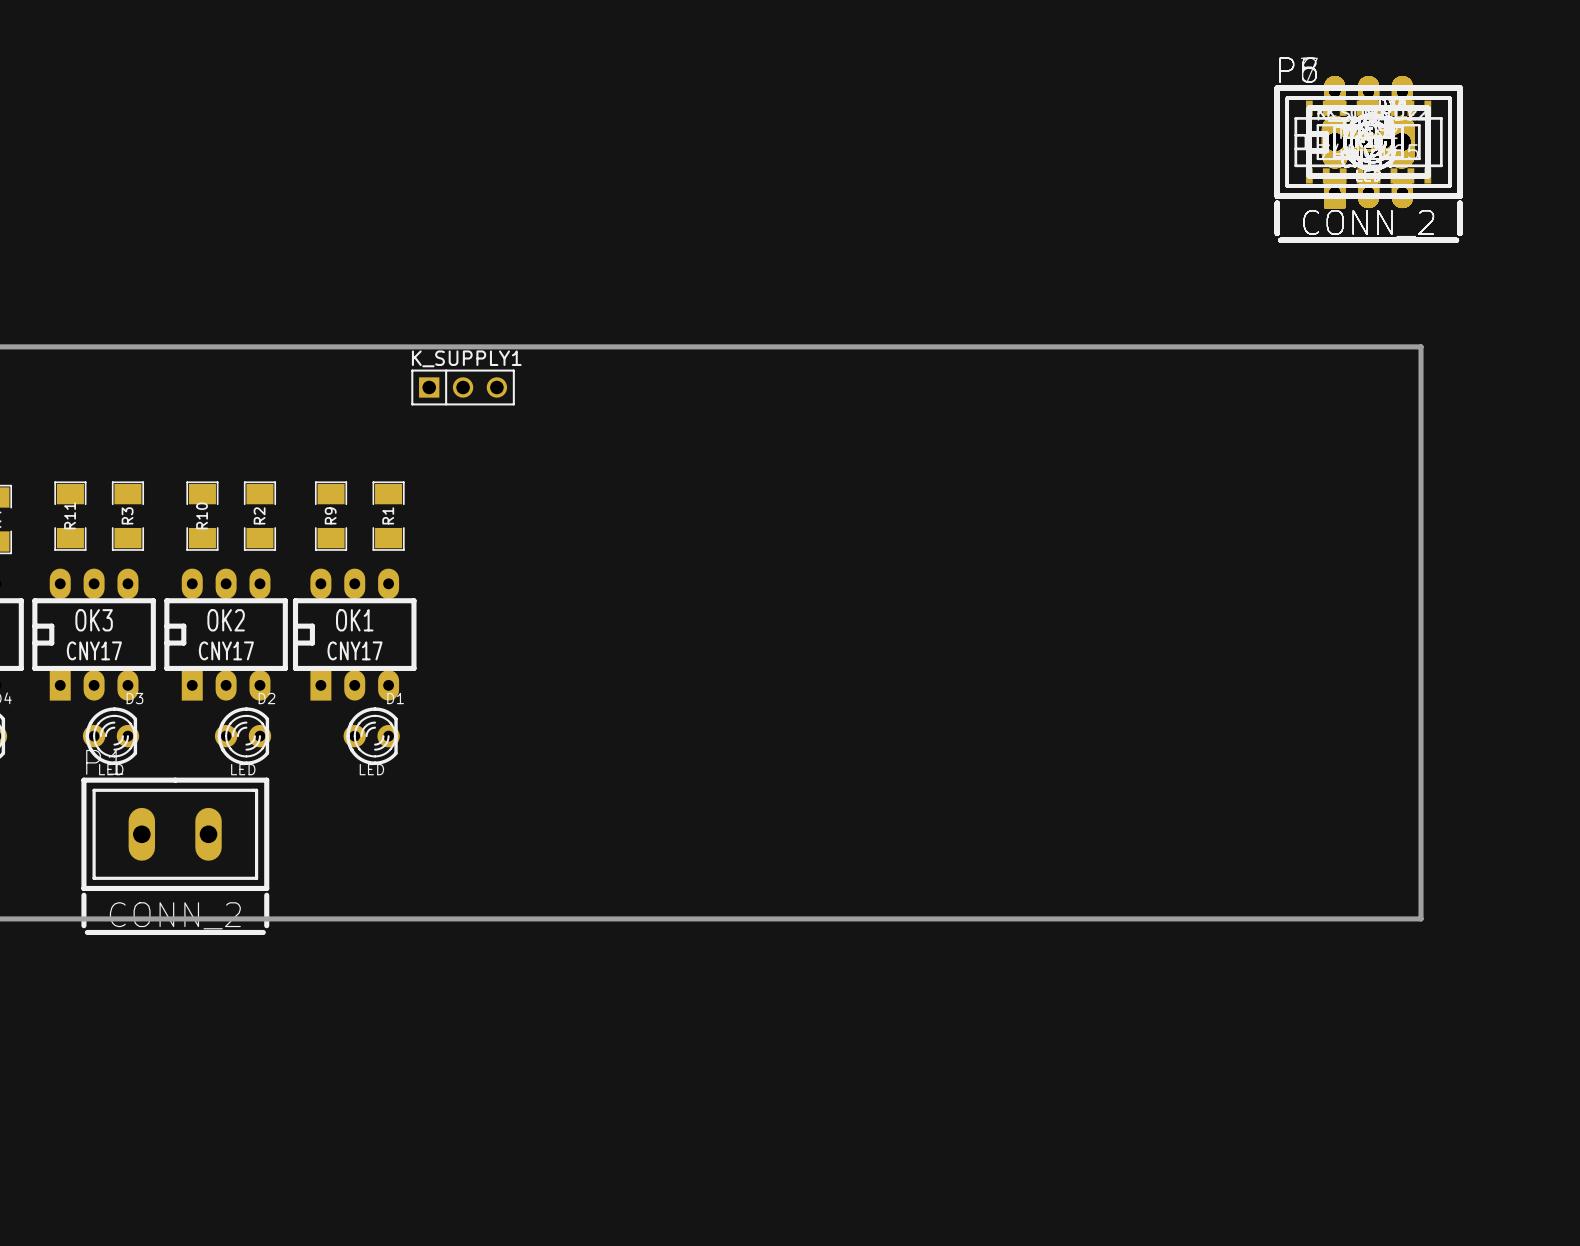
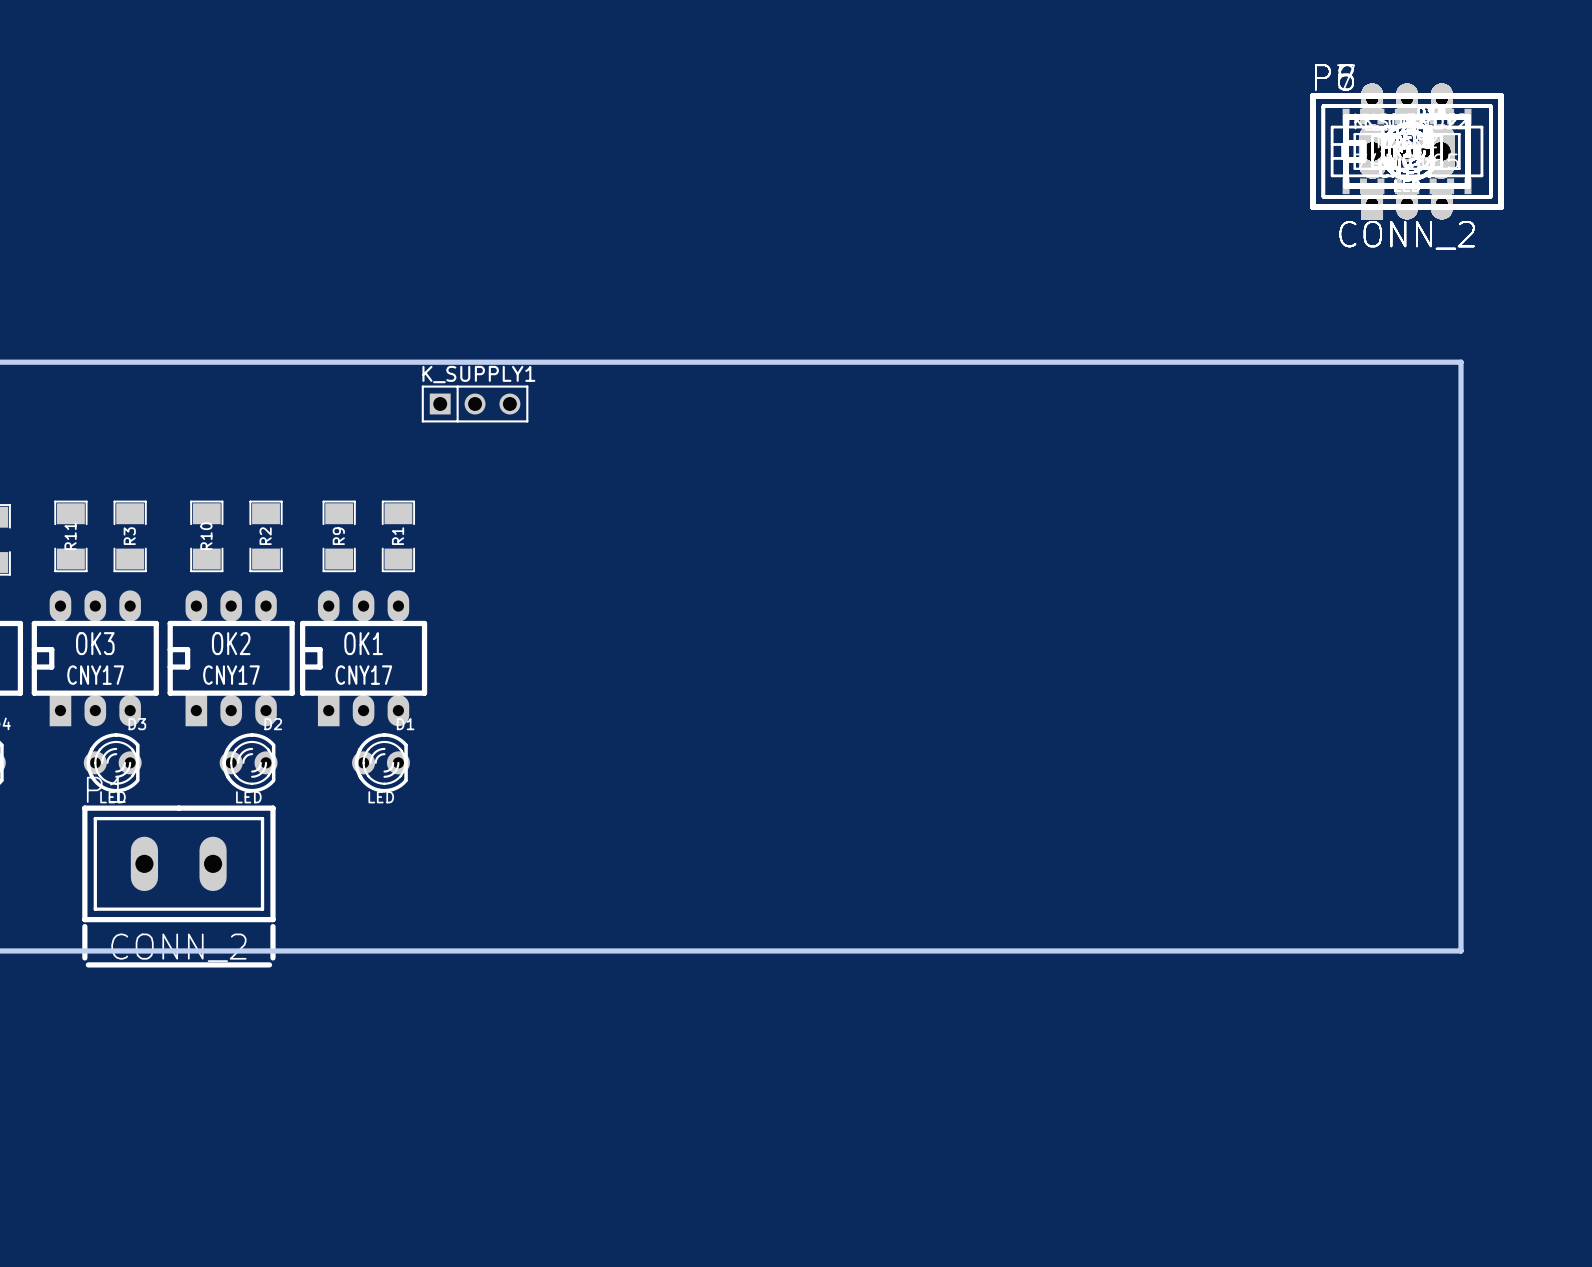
part footprint: [1274, 85, 1463, 243] -> [1310, 93, 1504, 210]
part footprint: [1274, 85, 1463, 243] -> [1310, 93, 1504, 210]
part footprint: [1274, 85, 1463, 243] -> [1310, 93, 1504, 210]
part footprint: [1274, 85, 1463, 243] -> [1310, 93, 1504, 210]

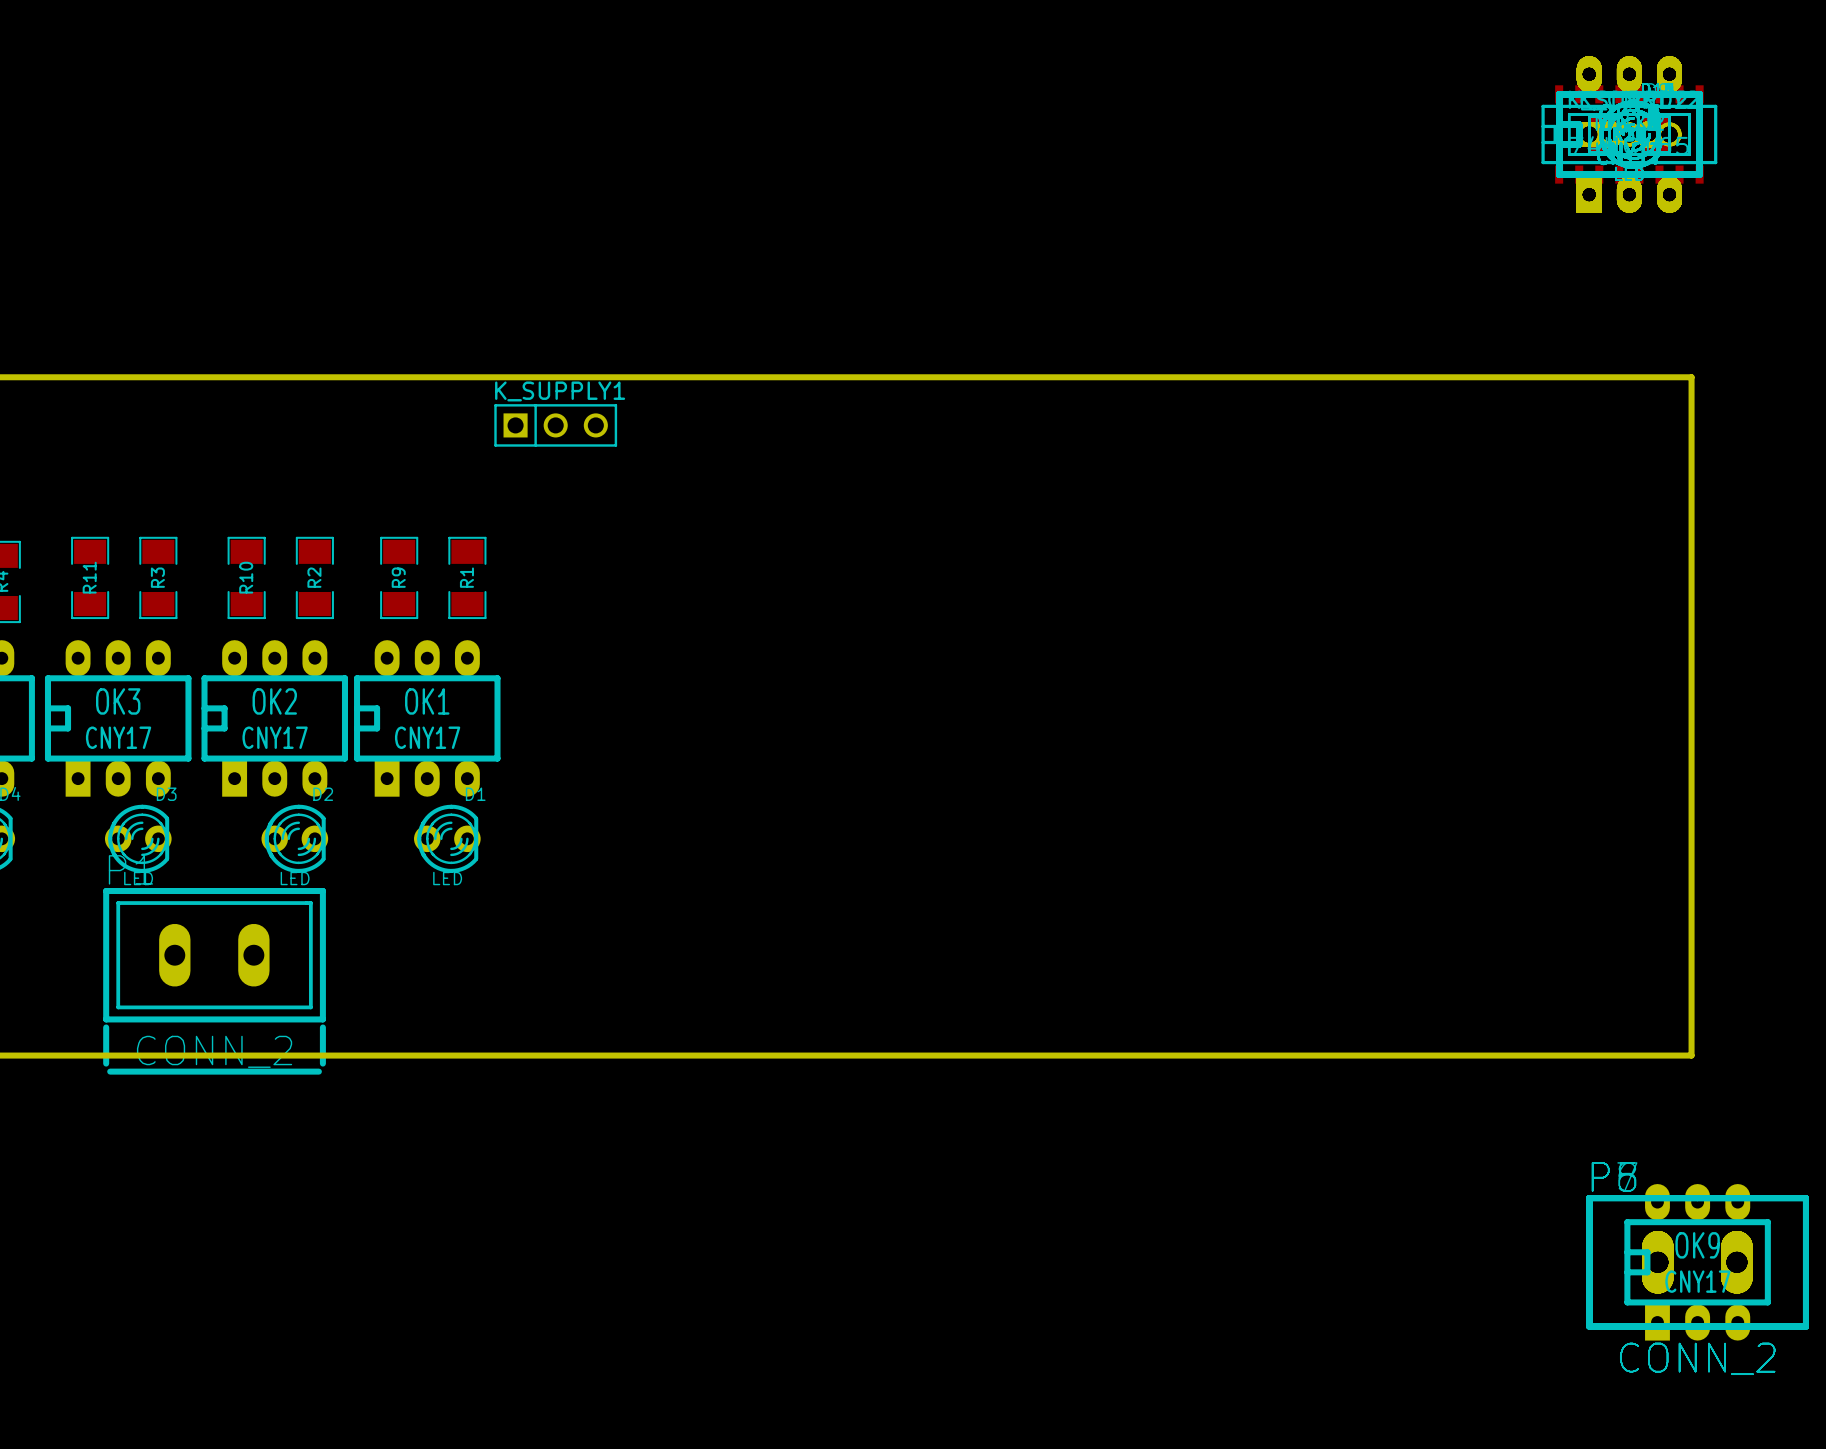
OK9 footprint: [1343, 83, 1471, 220] -> [1624, 1184, 1771, 1341]
part footprint: [1310, 93, 1504, 210] -> [1586, 1195, 1809, 1330]
part footprint: [1310, 93, 1504, 210] -> [1586, 1195, 1809, 1330]
part footprint: [1310, 93, 1504, 210] -> [1586, 1195, 1809, 1330]
part footprint: [1310, 93, 1504, 210] -> [1586, 1195, 1809, 1330]

